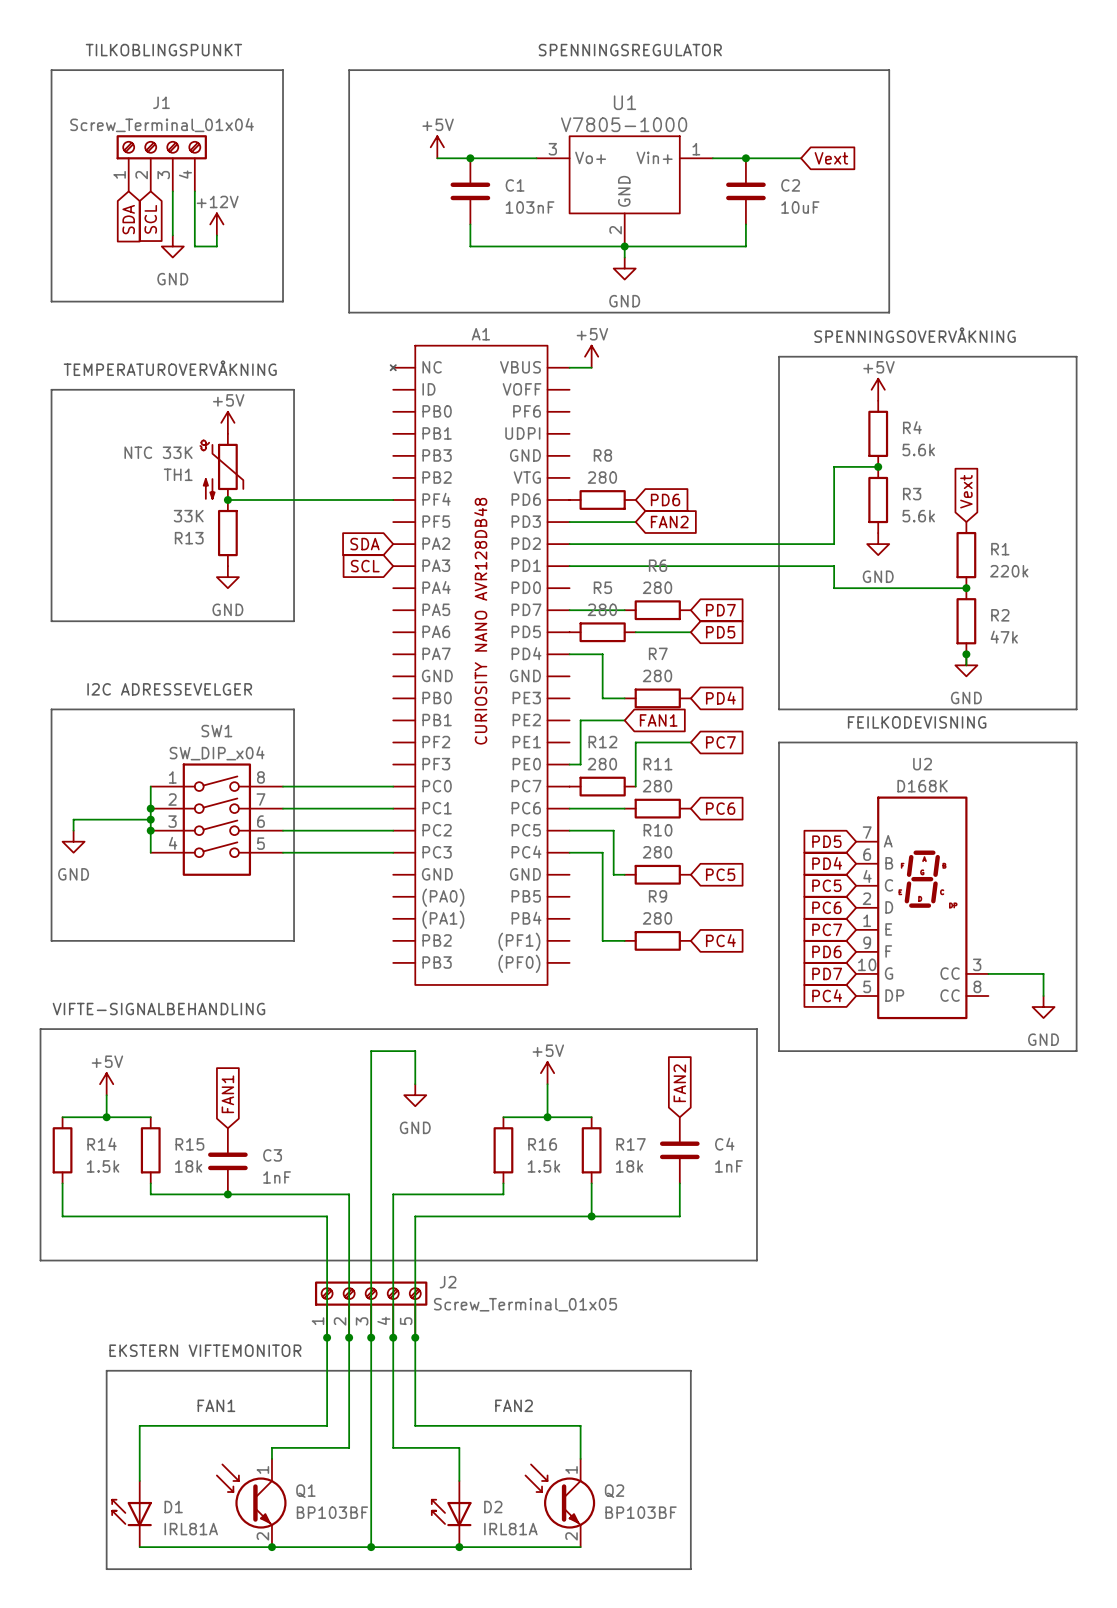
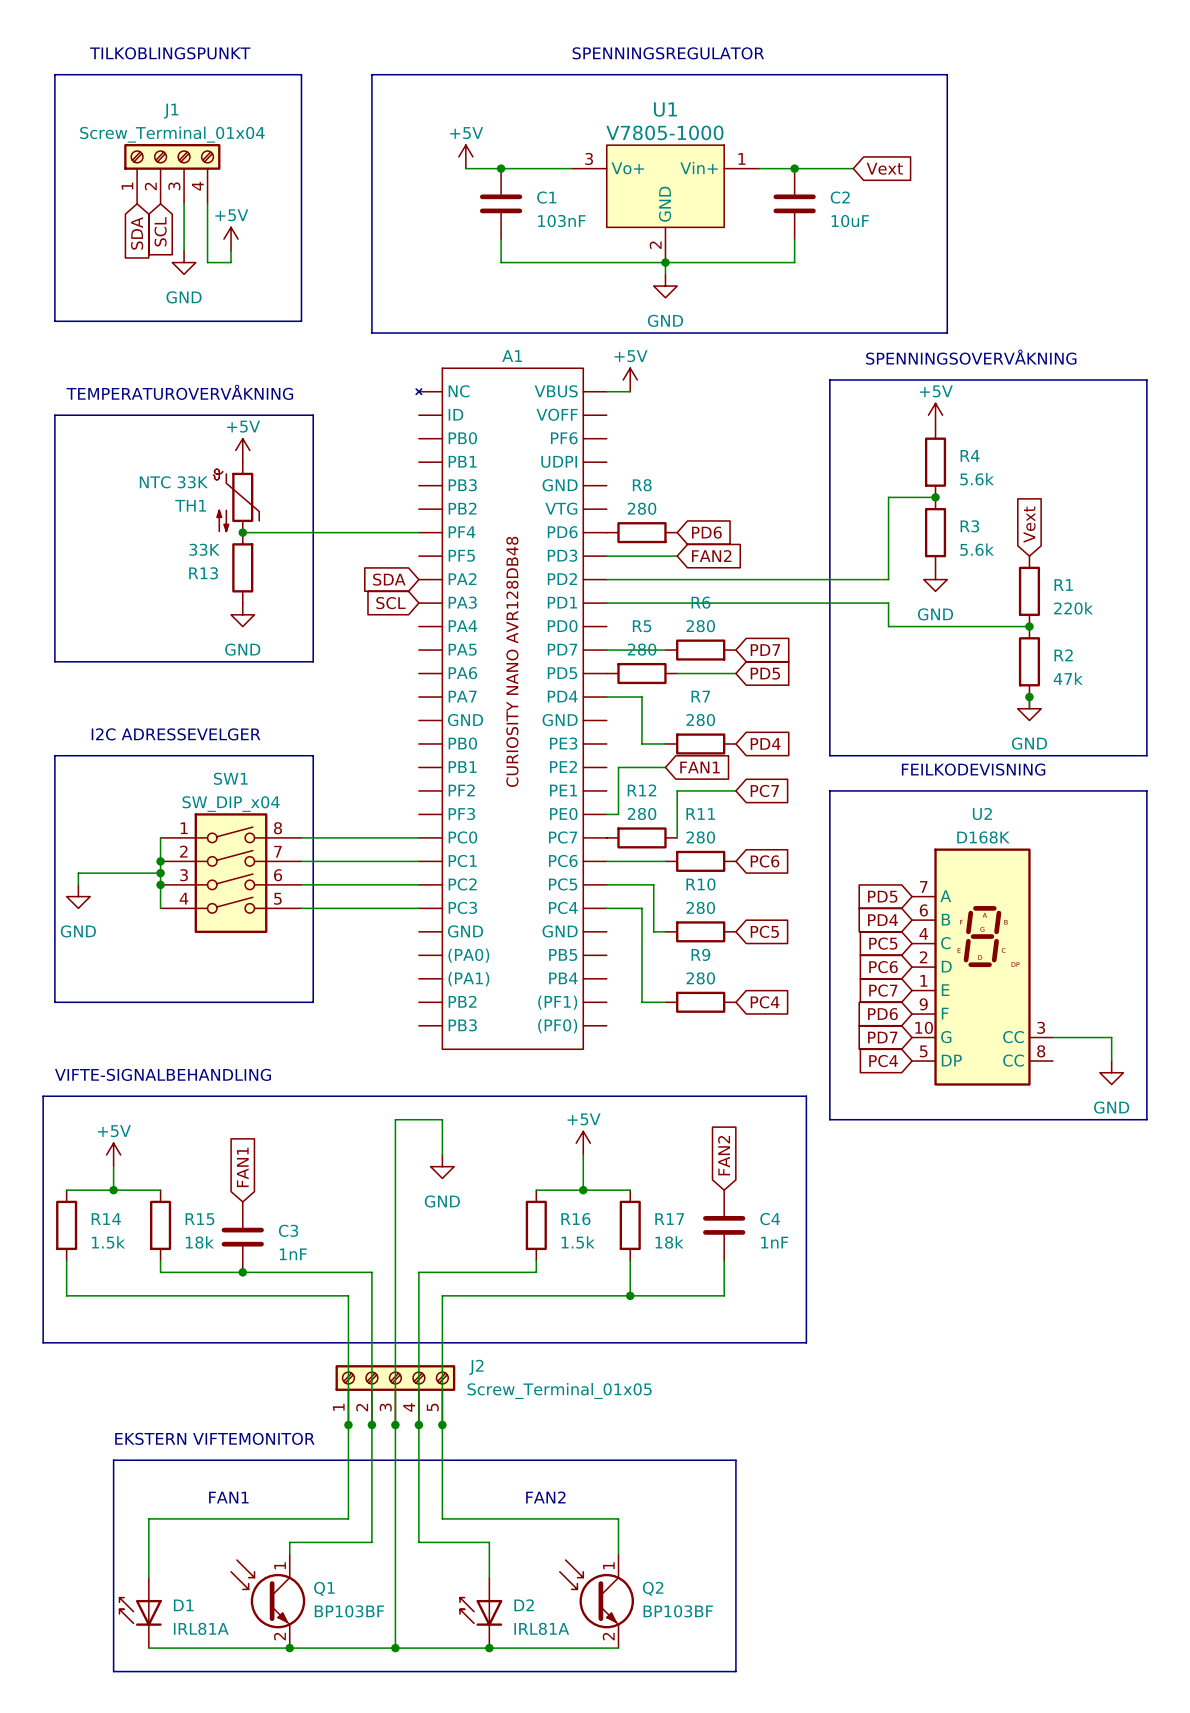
power symbol: +12V (216, 224) -> +5V (231, 239)

